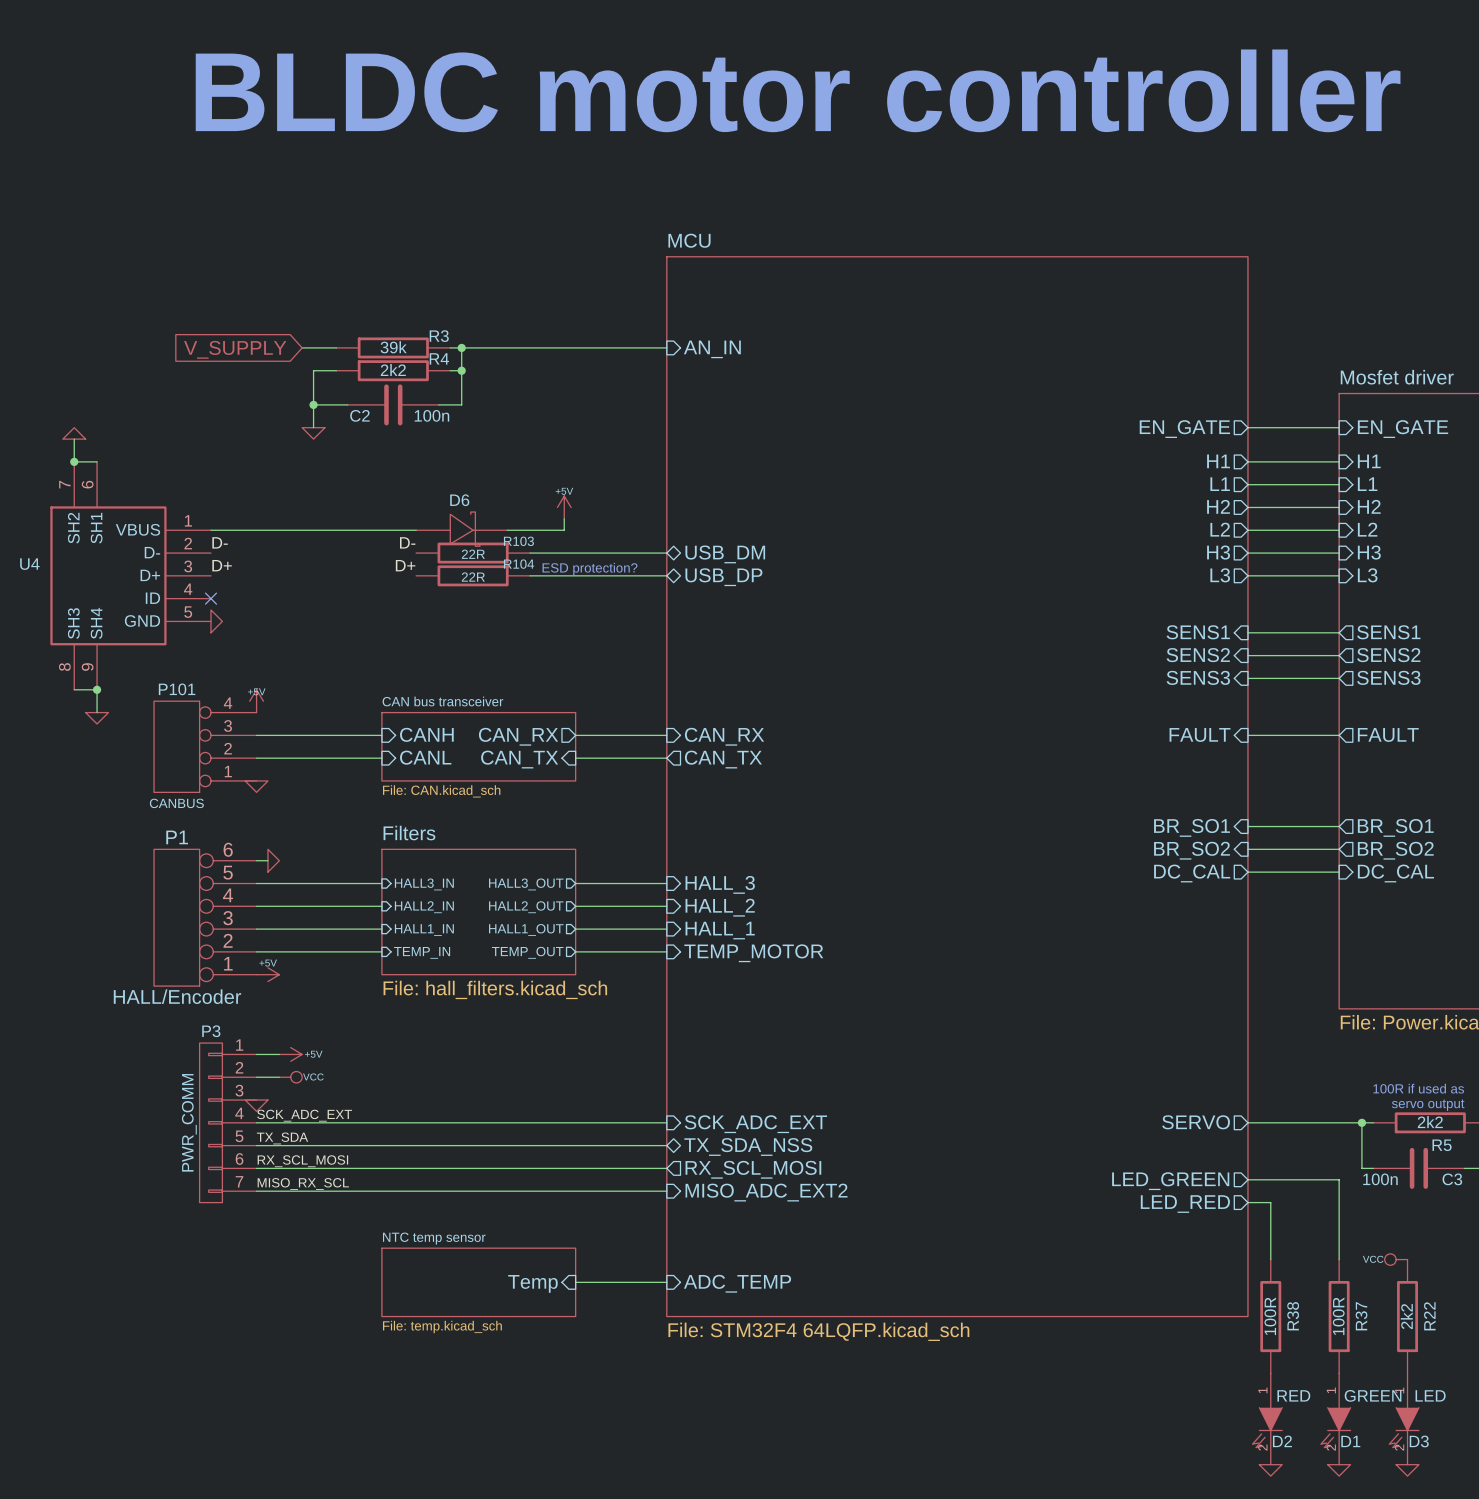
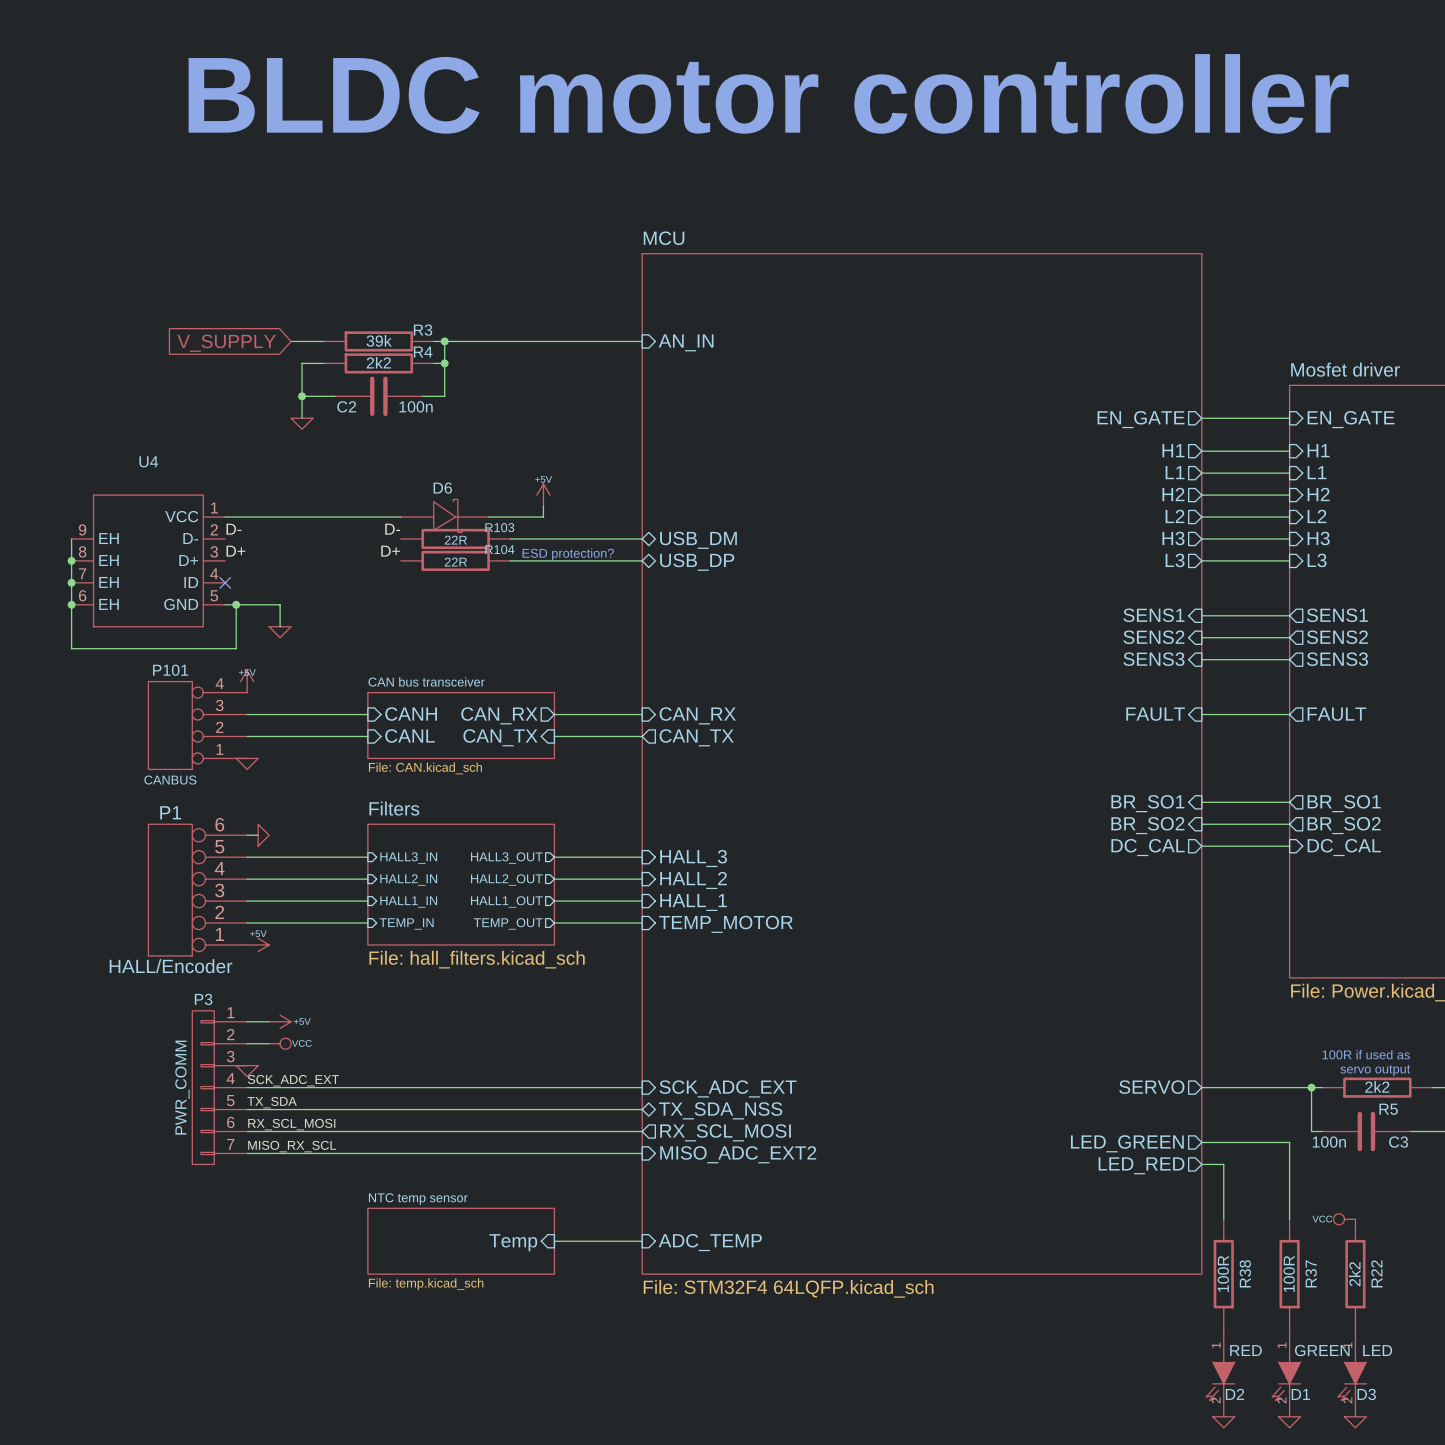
power symbol: (74, 433) -> none
wire: (74, 439) (74, 461) (97, 461) -> none
U4 symbol: [50, 461, 212, 690] -> [71, 495, 226, 627]
junction: (74, 461) -> none
label position: D- (220, 542) -> D- (233, 529)
wire: none -> (71, 538) (71, 648) (236, 648) (236, 604)
U4 name position: U4 (29, 564) -> U4 (148, 461)
label position: D+ (222, 565) -> D+ (235, 551)
junction: none -> (71, 560)
junction: none -> (71, 582)
no-connect mark position: (211, 598) -> (225, 582)
junction: none -> (71, 604)
power symbol rotation: 0° (216, 621) -> 90° clockwise (280, 632)
power symbol position: (216, 621) -> (280, 632)
wire: none -> (225, 604) (280, 604) (280, 626)
junction: none -> (236, 604)
wire: (74, 689) (97, 689) (97, 712) -> none
junction: (97, 689) -> none
power symbol: (97, 718) -> none

